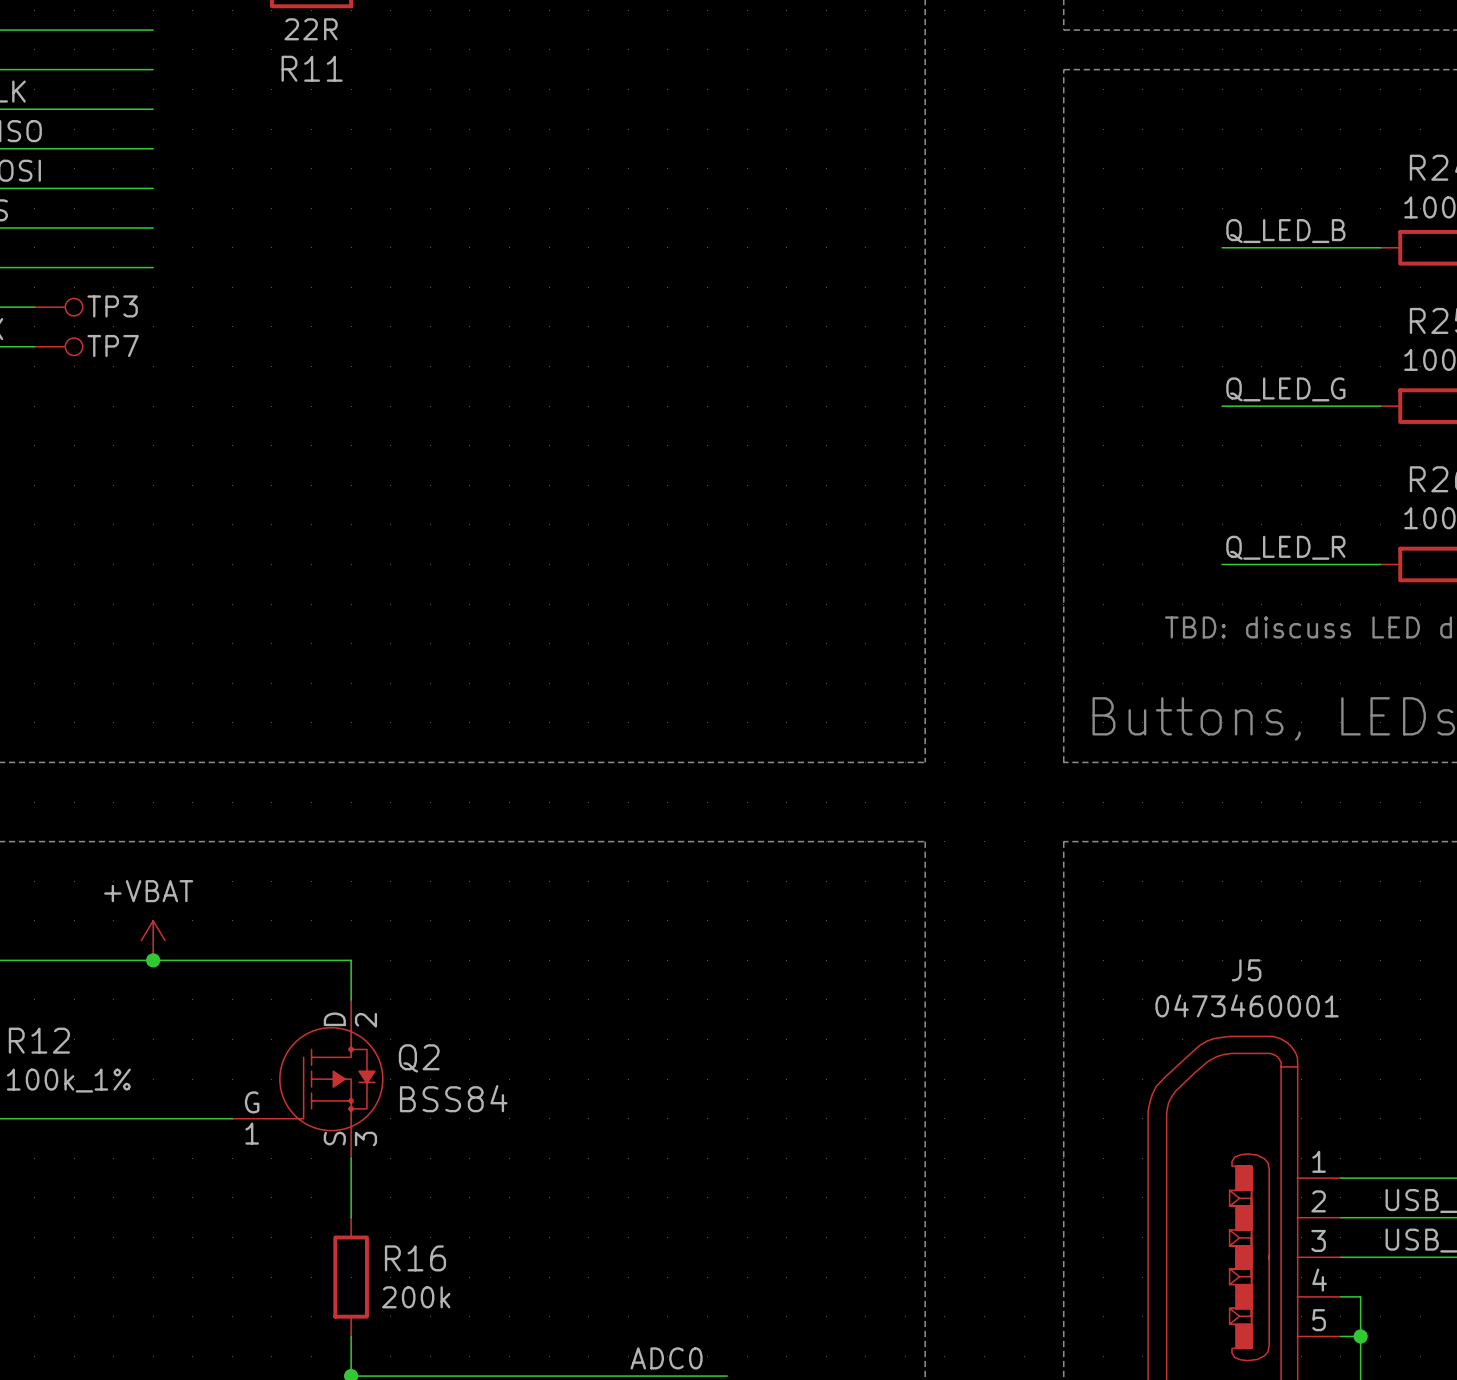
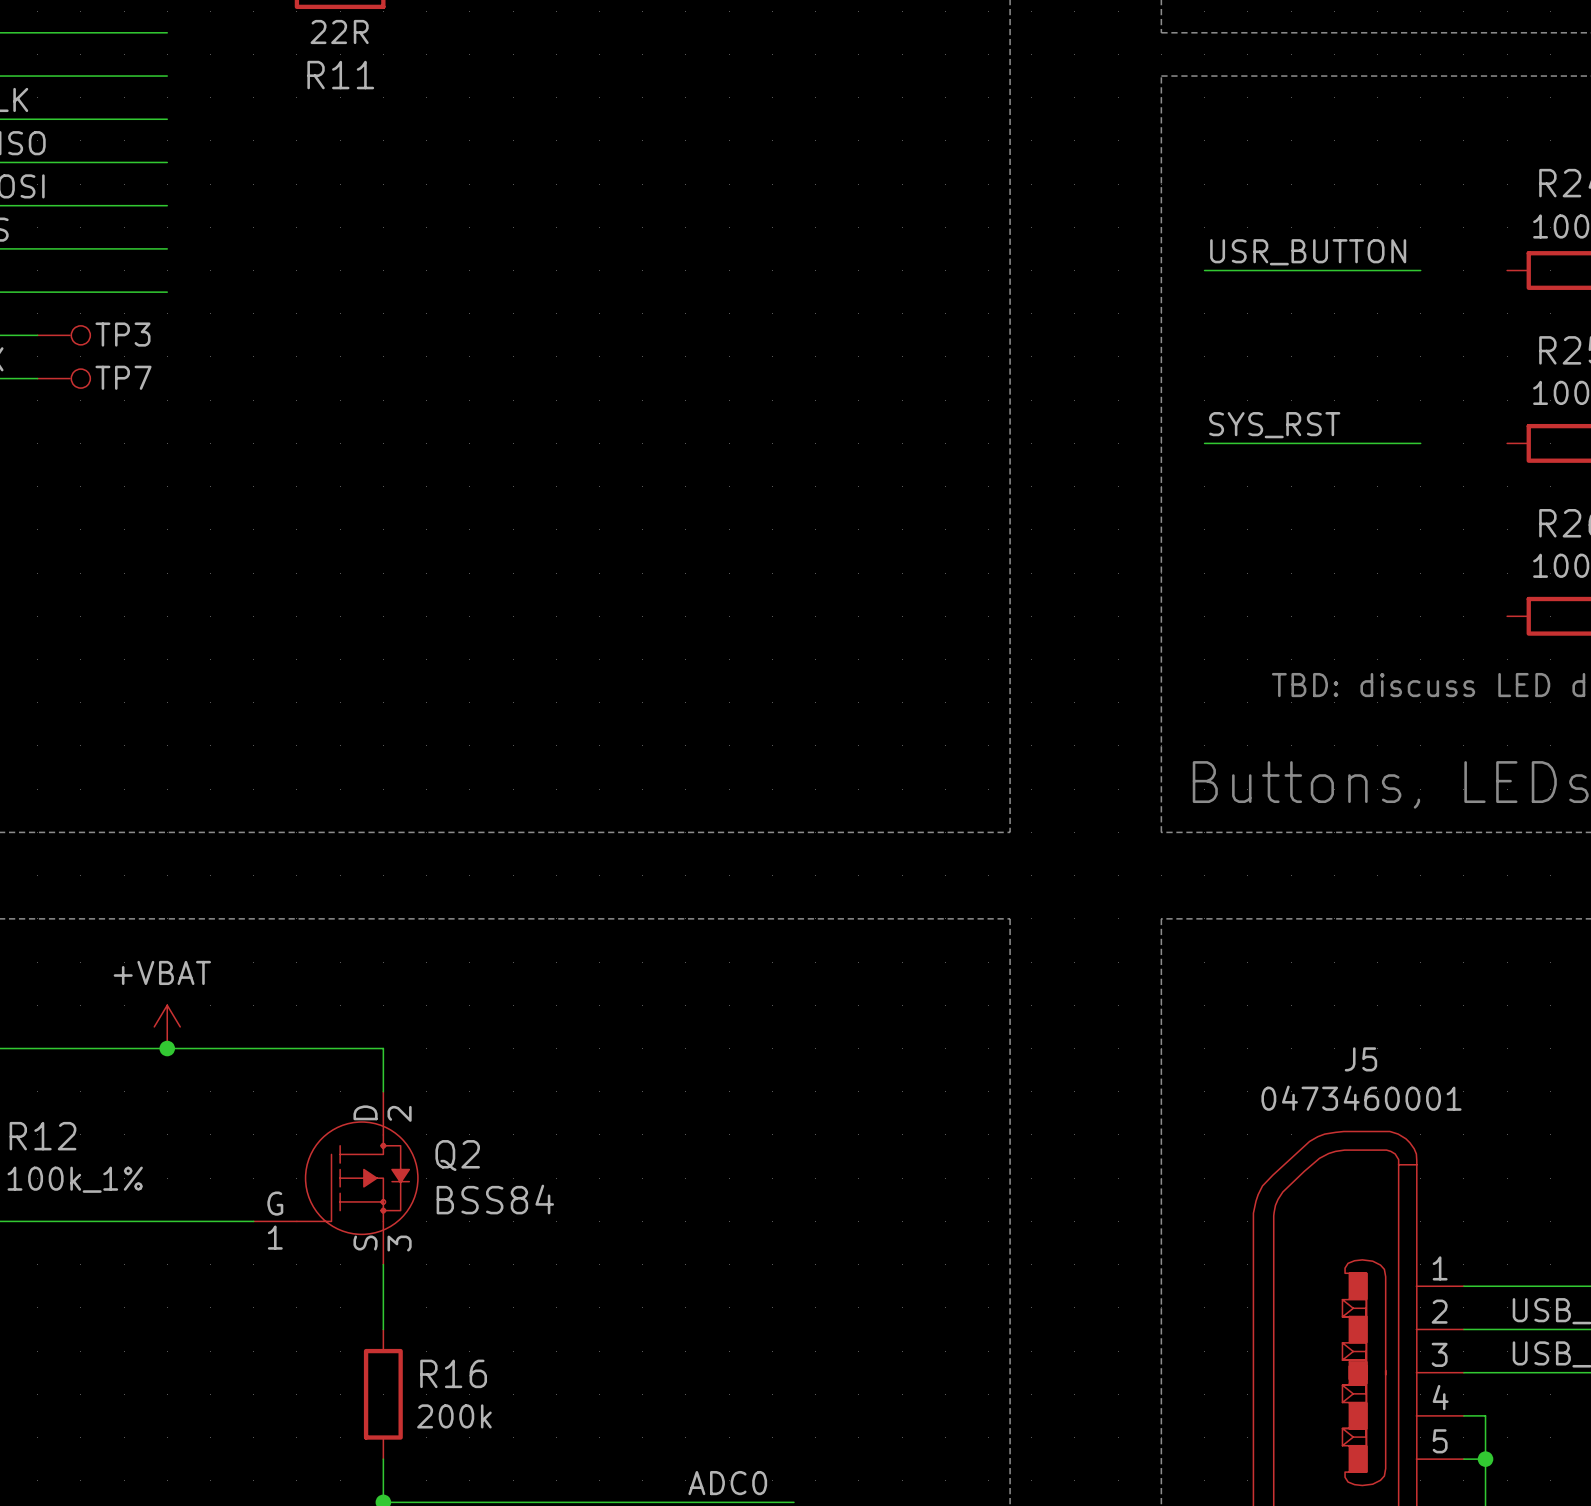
label: none -> USR_BUTTON (1308, 252)
label: Q_LED_B (1285, 231) -> none
wire: none -> (1204, 270) (1334, 270)
wire: (1301, 247) (1380, 247) -> none
label: none -> SYS_RST (1274, 425)
label: Q_LED_G (1285, 389) -> none
wire: none -> (1204, 443) (1334, 443)
wire: (1301, 406) (1380, 406) -> none
label: Q_LED_R (1285, 547) -> none
wire: (1222, 564) (1380, 564) -> none

